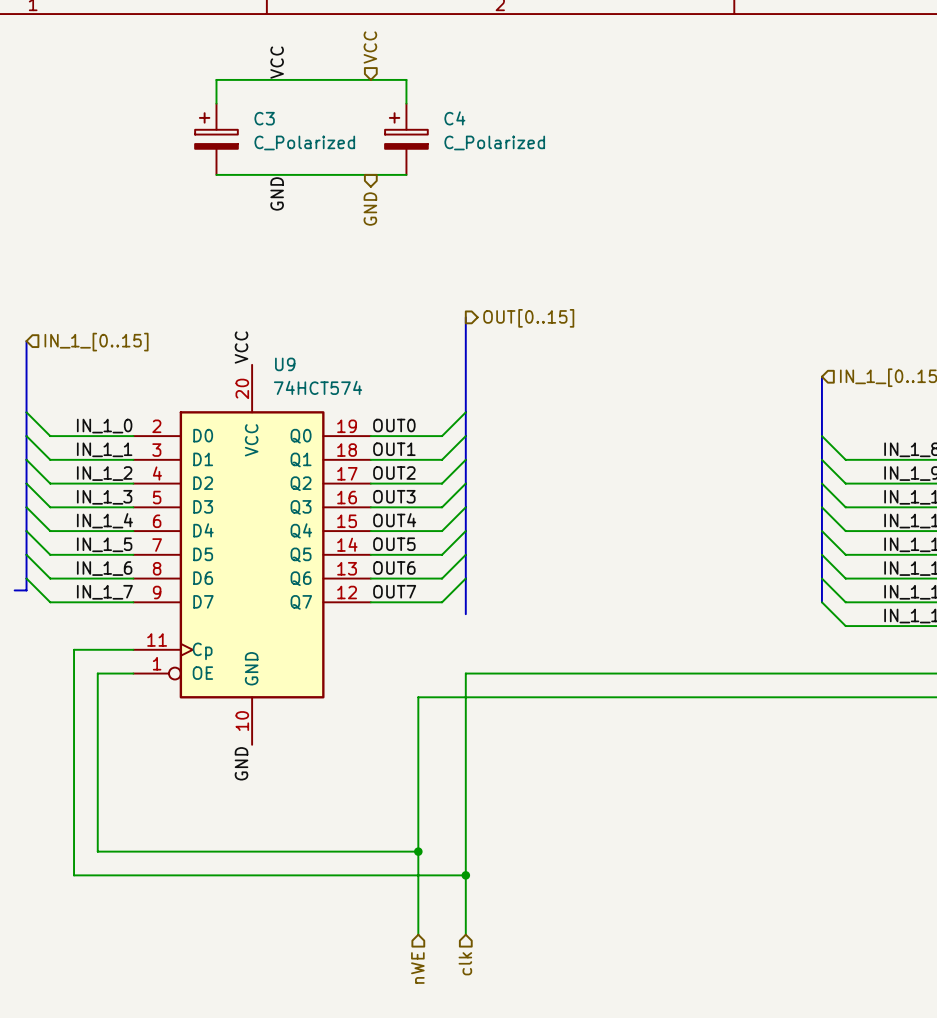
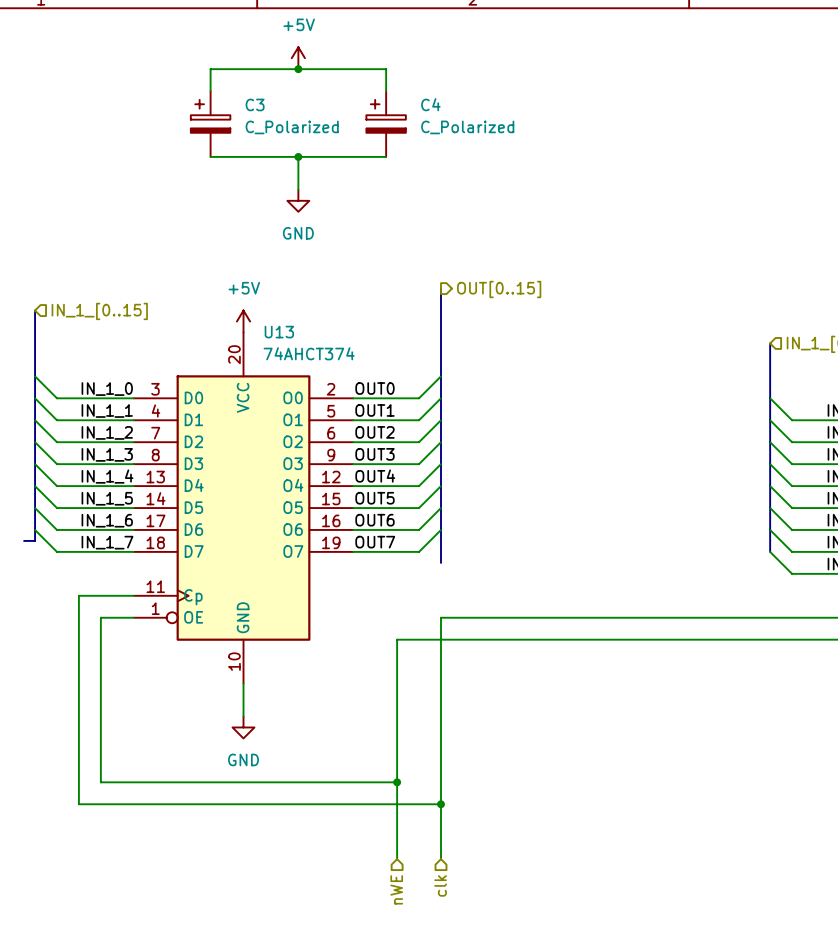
hierarchical label: VCC (370, 47) -> none
label: VCC (277, 62) -> none
power symbol: none -> +5V (298, 58)
junction: none -> (298, 69)
wire: none -> (298, 156) (298, 189)
junction: none -> (298, 156)
label: GND (277, 193) -> none
hierarchical label: GND (370, 209) -> none
power symbol: none -> GND (298, 200)
label: VCC (241, 347) -> none
power symbol: none -> +5V (243, 321)
U9 symbol: [133, 364, 371, 745] -> [133, 332, 354, 684]
U9 name: U9 (285, 364) -> U13 (279, 332)
U9 value: 74HCT574 (318, 387) -> 74AHCT374 (309, 353)
wire: none -> (243, 683) (243, 716)
label: GND (241, 763) -> none
power symbol: none -> GND (243, 727)

